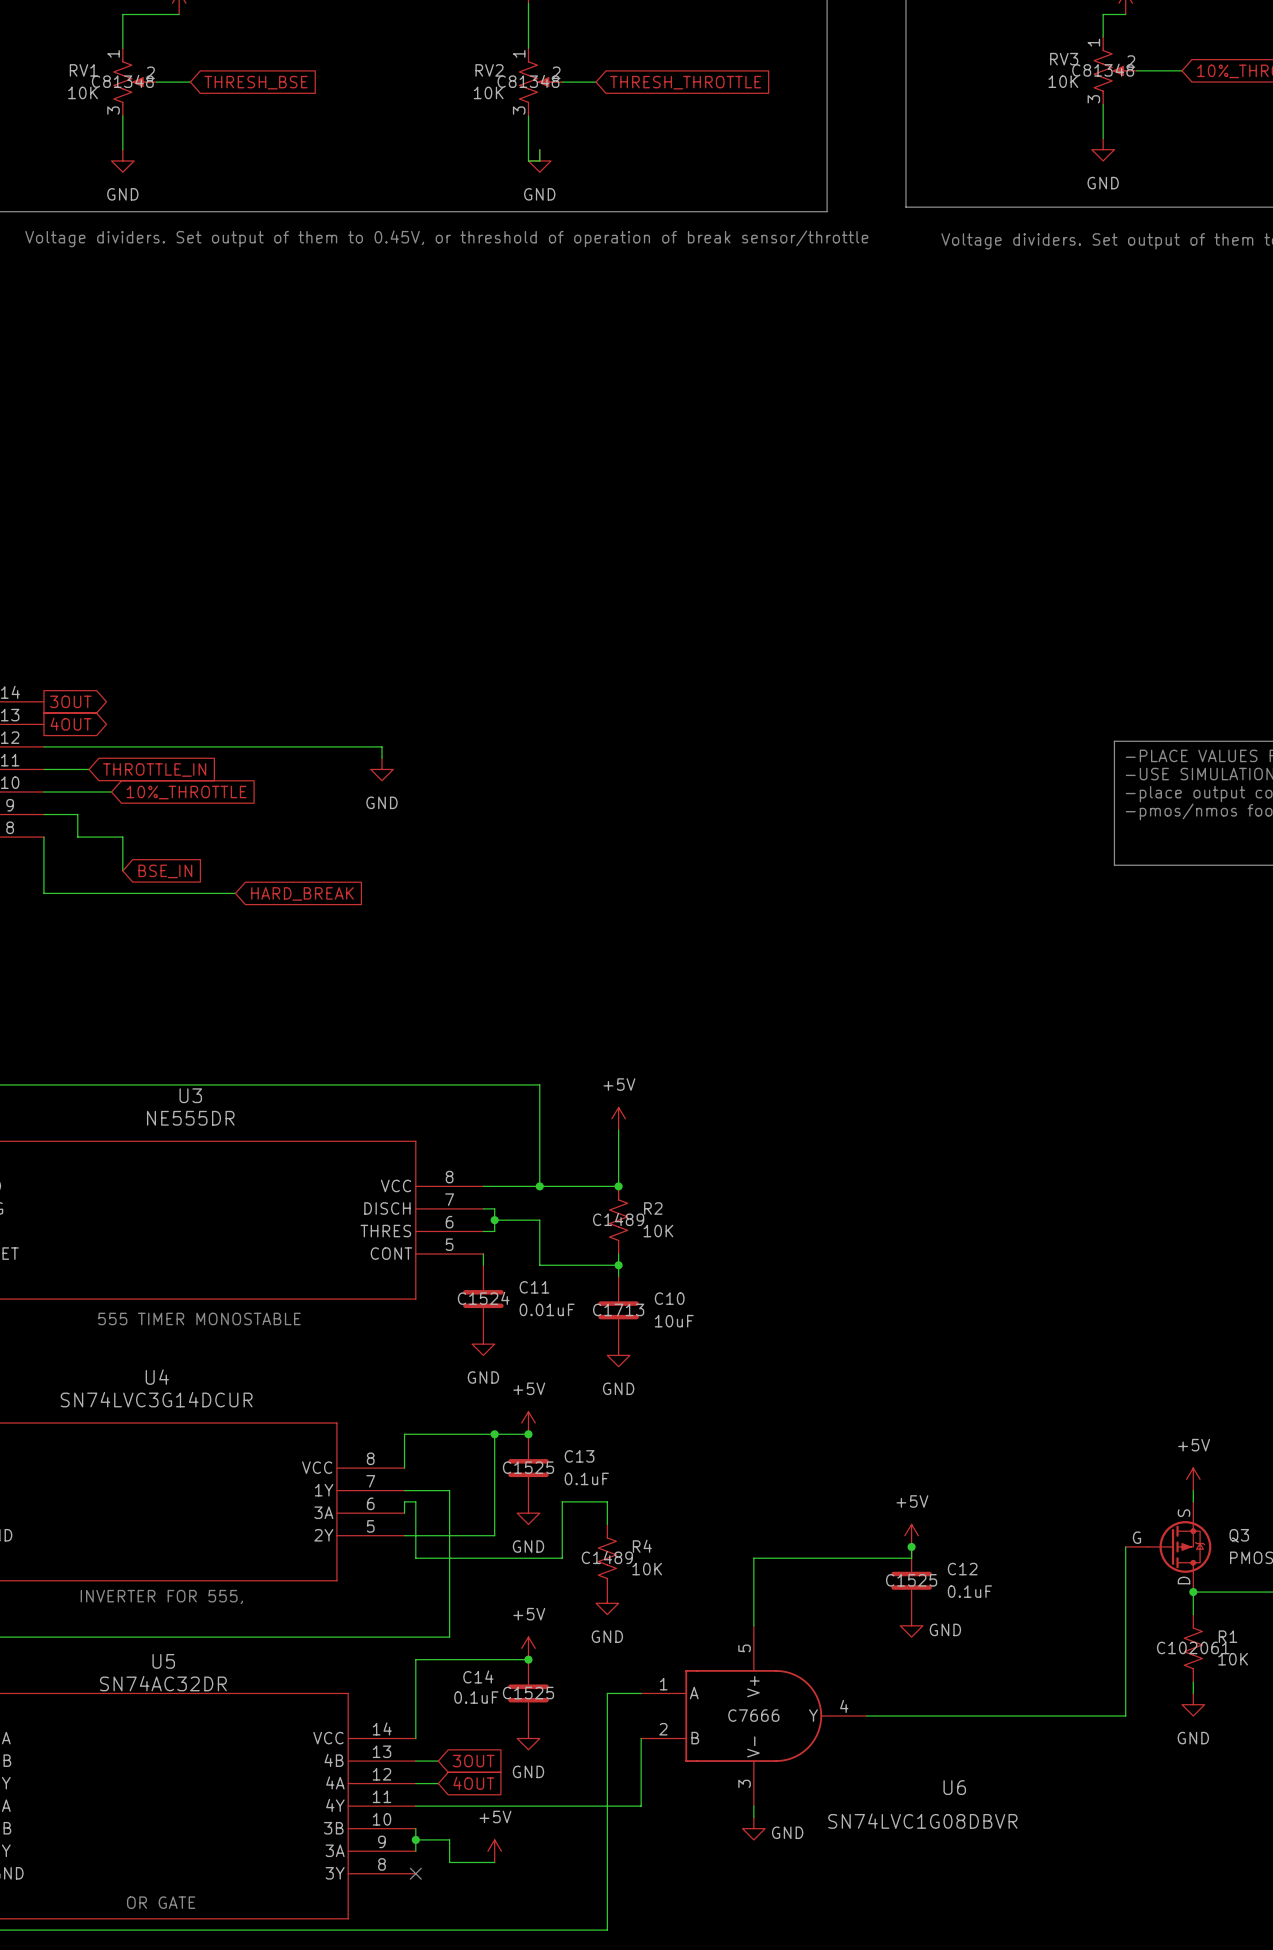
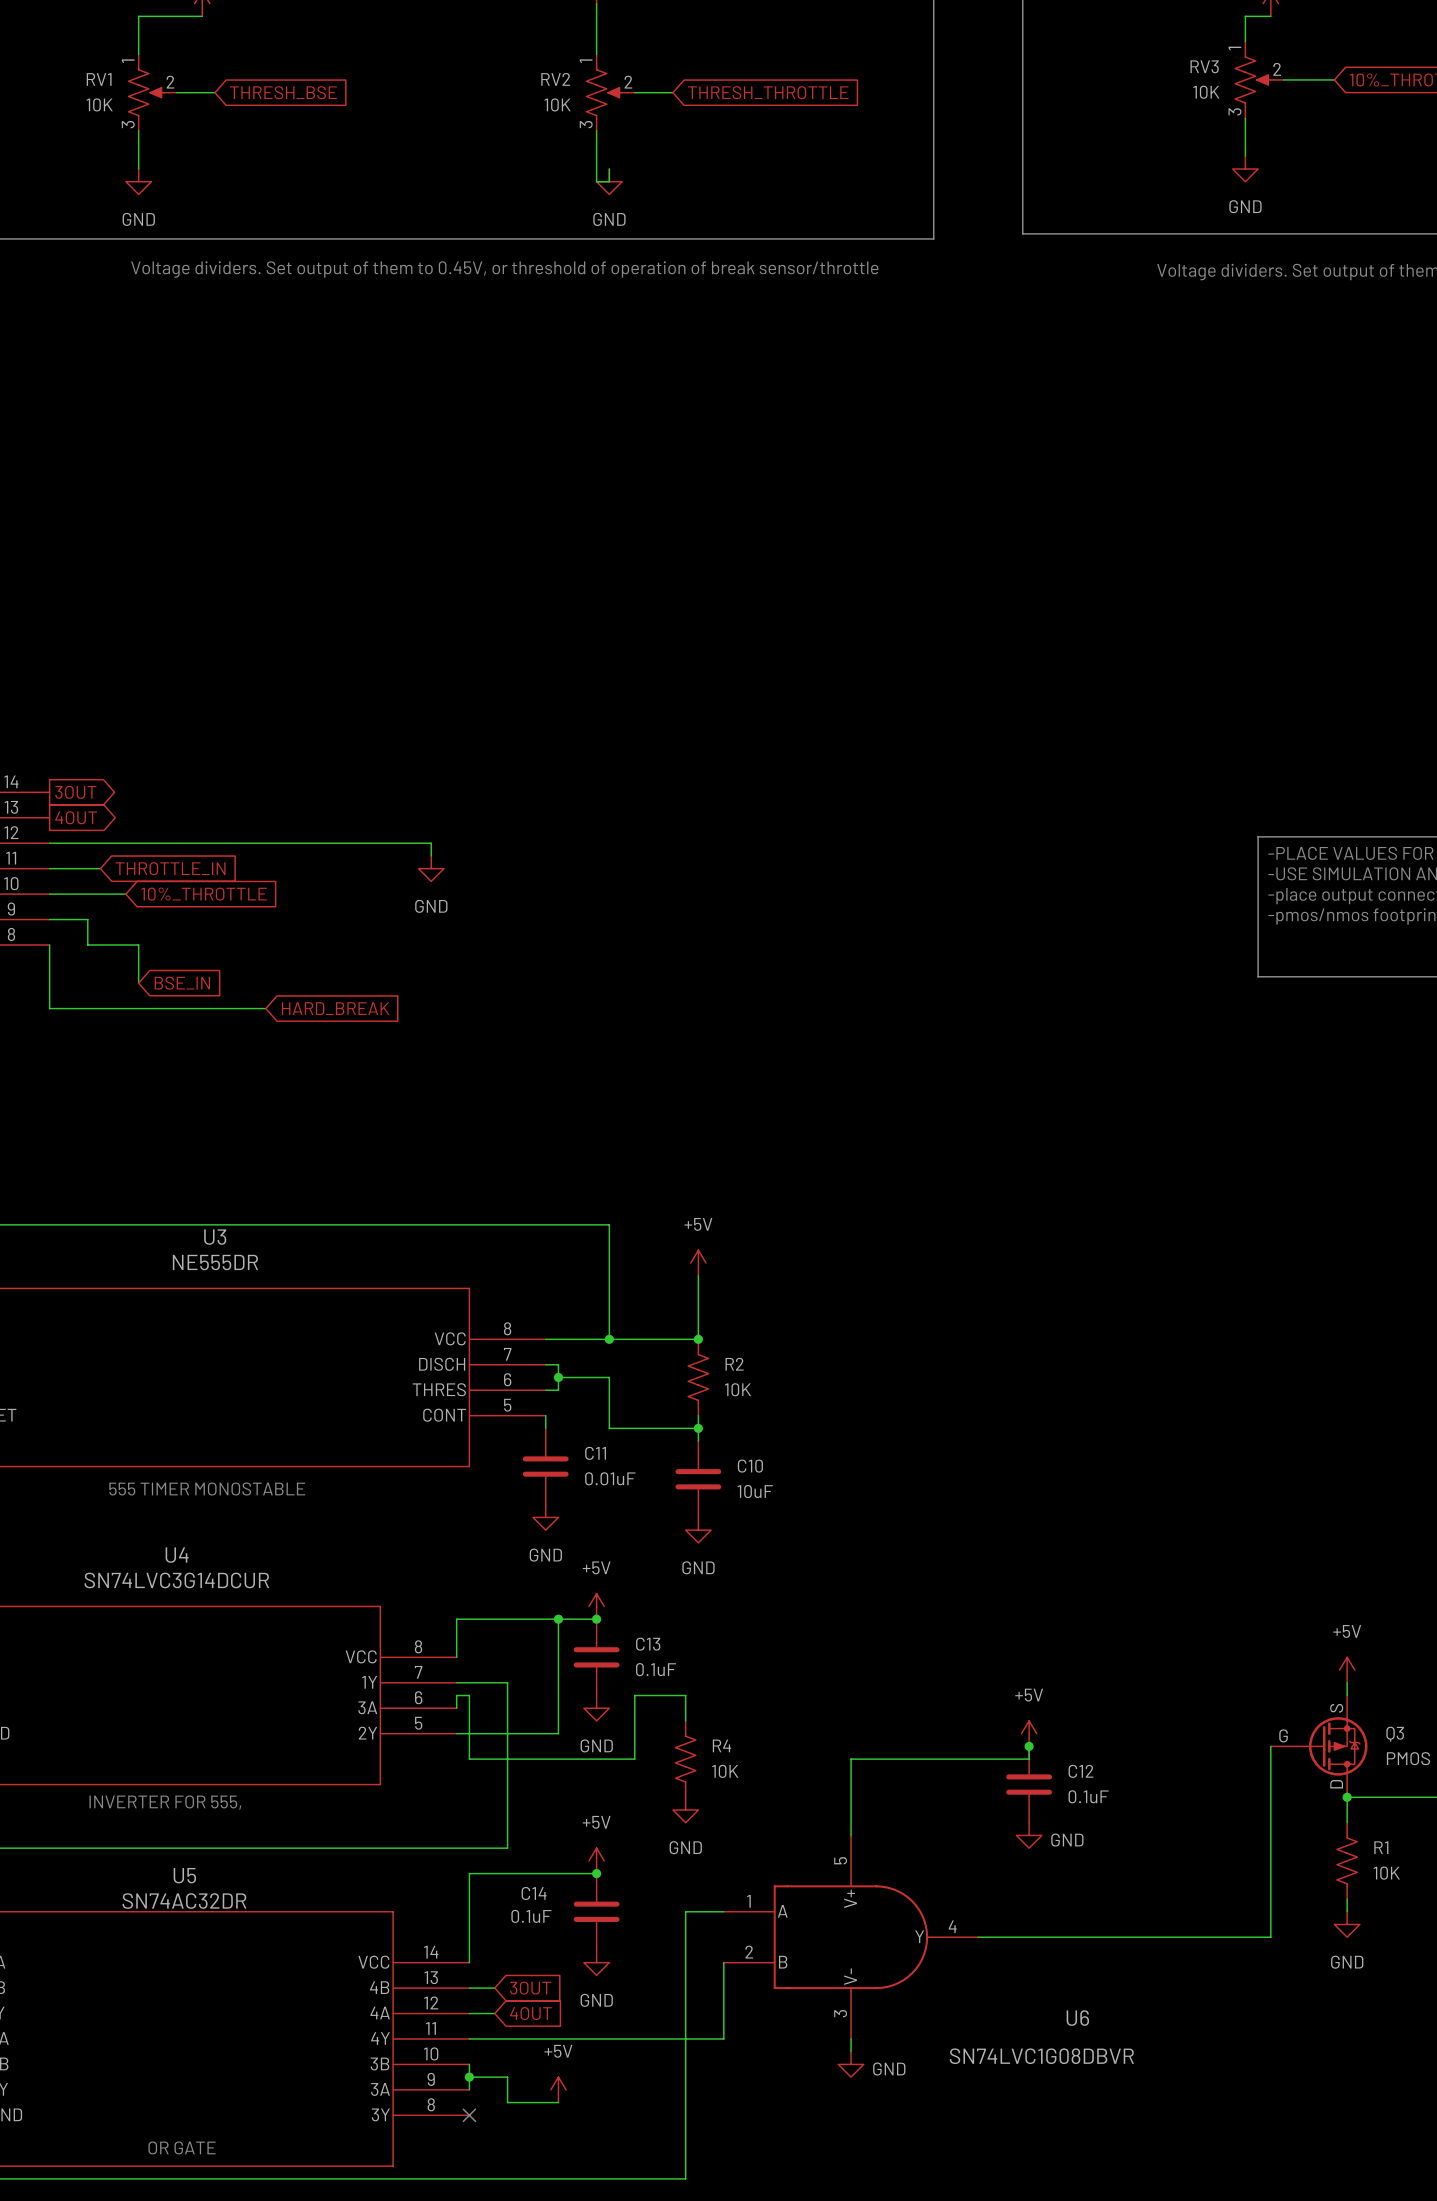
RV3 text: C81348 (1103, 70) -> none
RV1 text: C81348 (122, 81) -> none
RV2 text: C81348 (528, 81) -> none
R2 text: C1489 (618, 1219) -> none
C11 text: C1524 (483, 1298) -> none
C10 text: C1713 (618, 1309) -> none
C13 text: C1525 (528, 1467) -> none
R4 text: C1489 (607, 1557) -> none
C12 text: C1525 (911, 1580) -> none
R1 text: C102061 (1193, 1647) -> none
C14 text: C1525 (528, 1693) -> none
U6 text: C7666 (753, 1715) -> none

